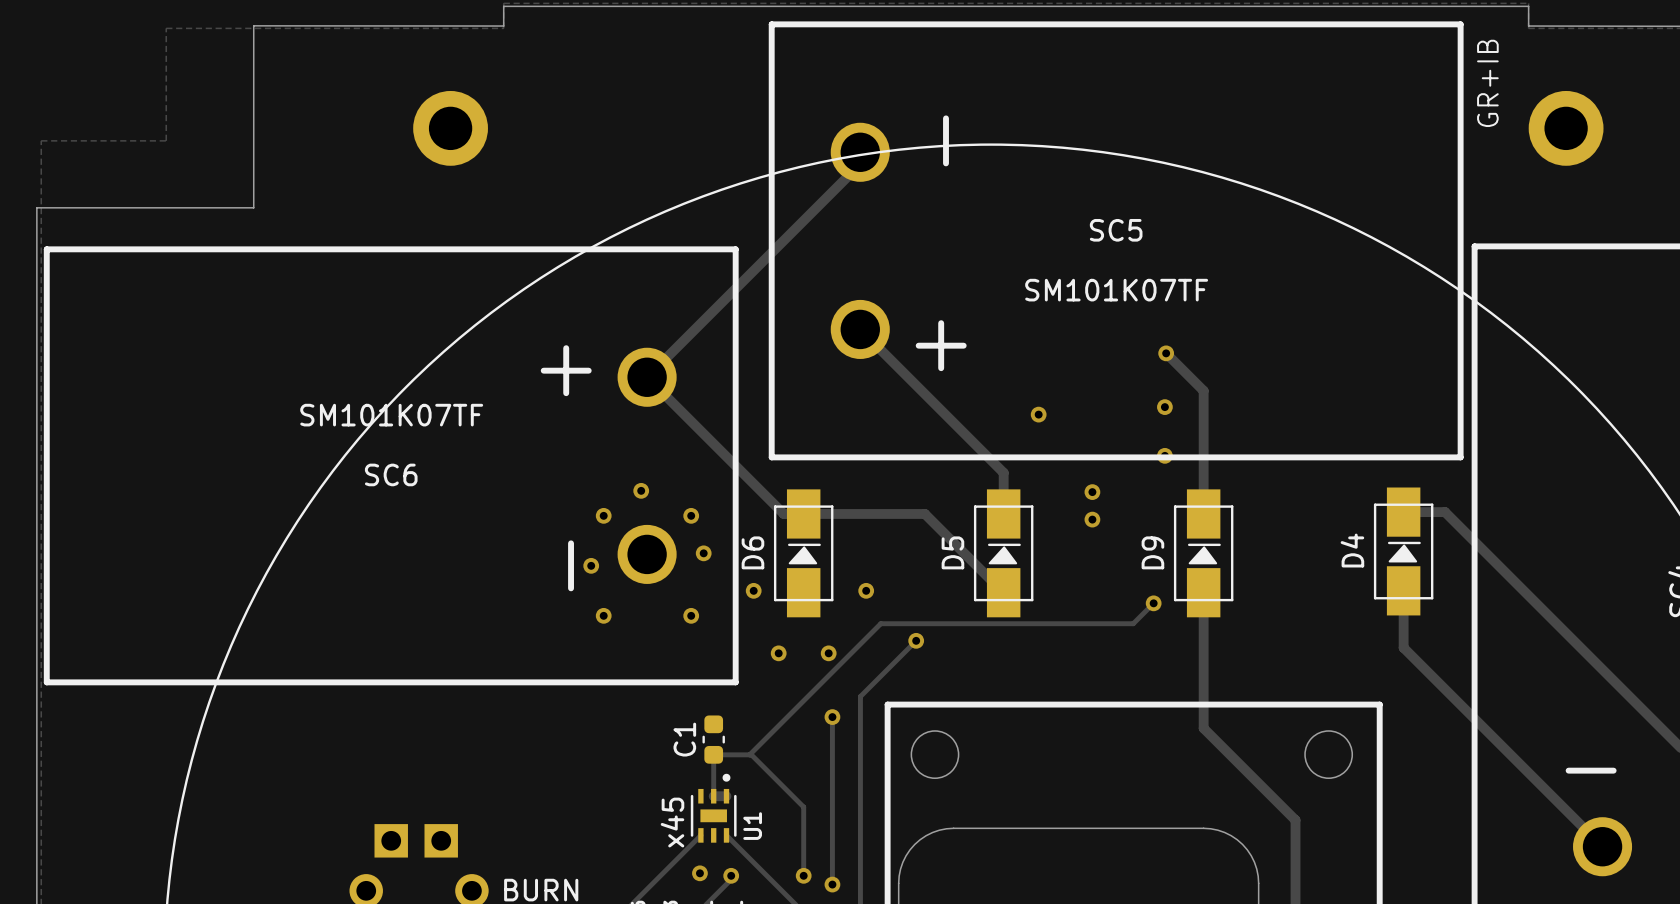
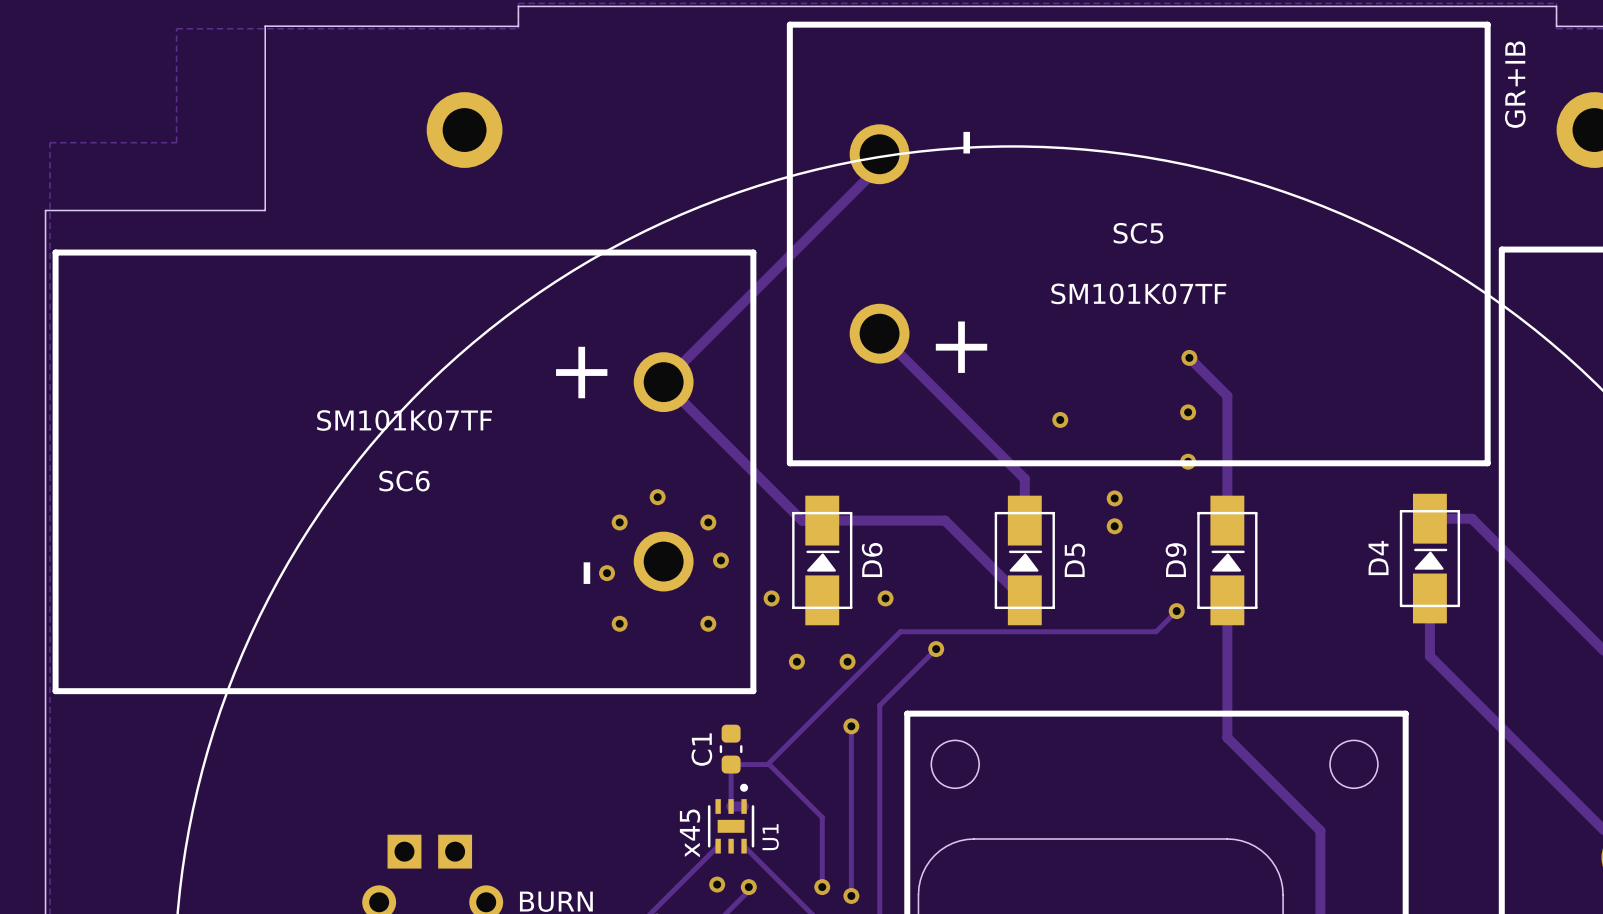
D6 name position: D6 (752, 552) -> D6 (872, 559)
D5 name position: D5 (952, 552) -> D5 (1074, 560)

